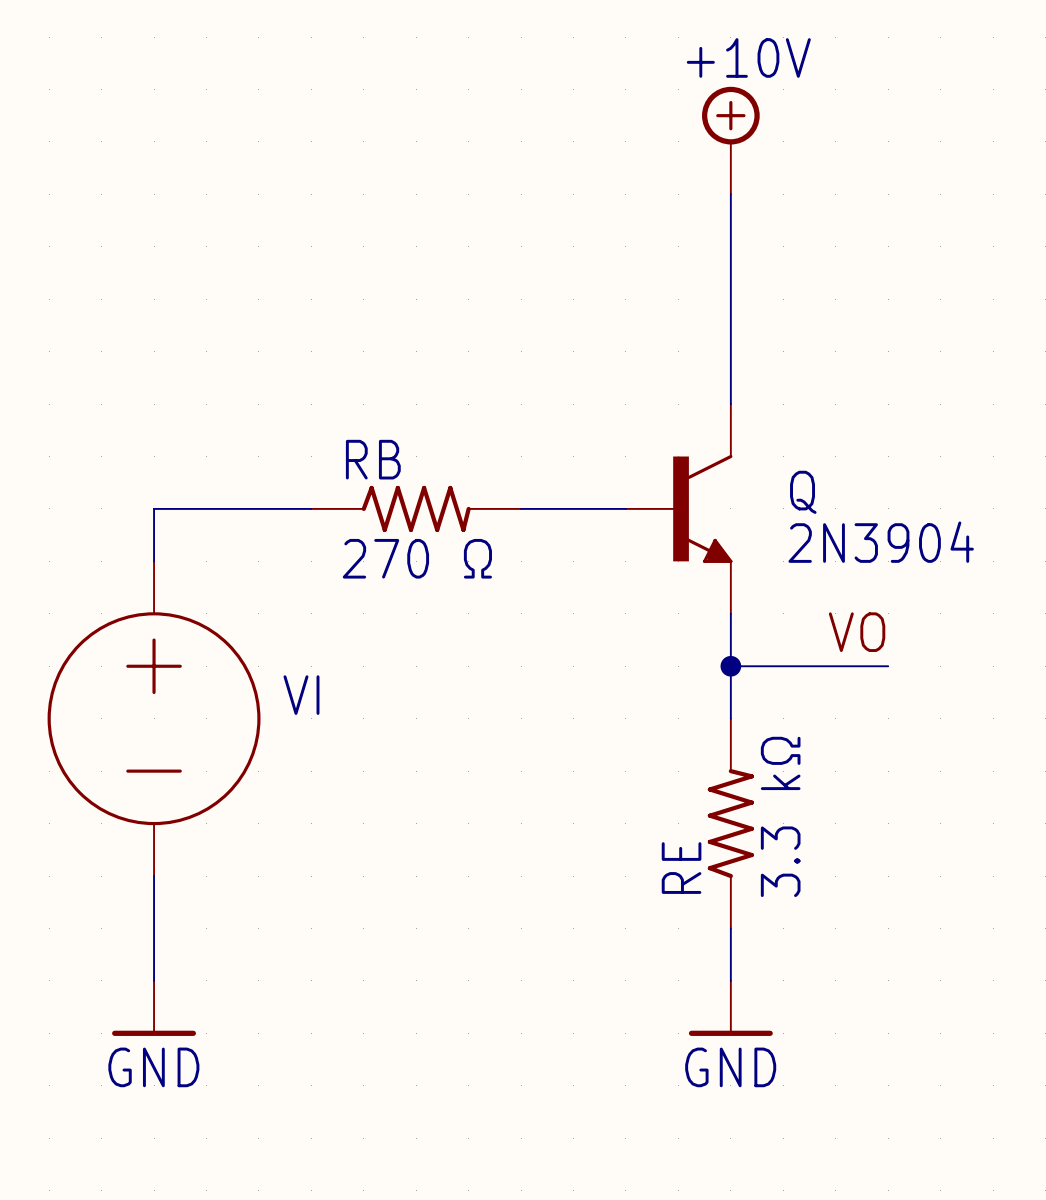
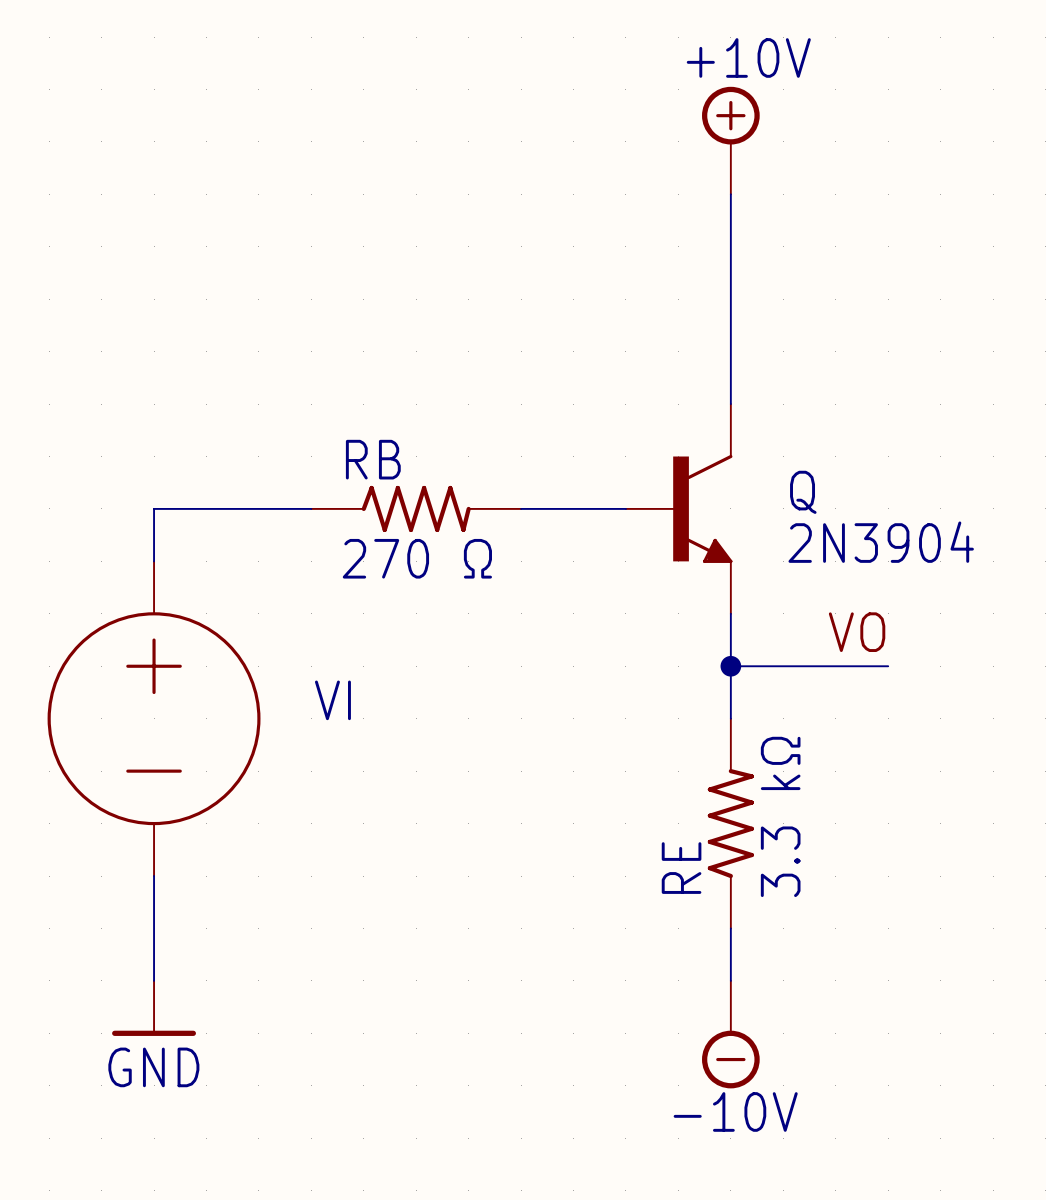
VI name position: VI (301, 695) -> VI (332, 700)
power symbol: GND (730, 1008) -> none
power symbol: none -> -10V (730, 1034)

